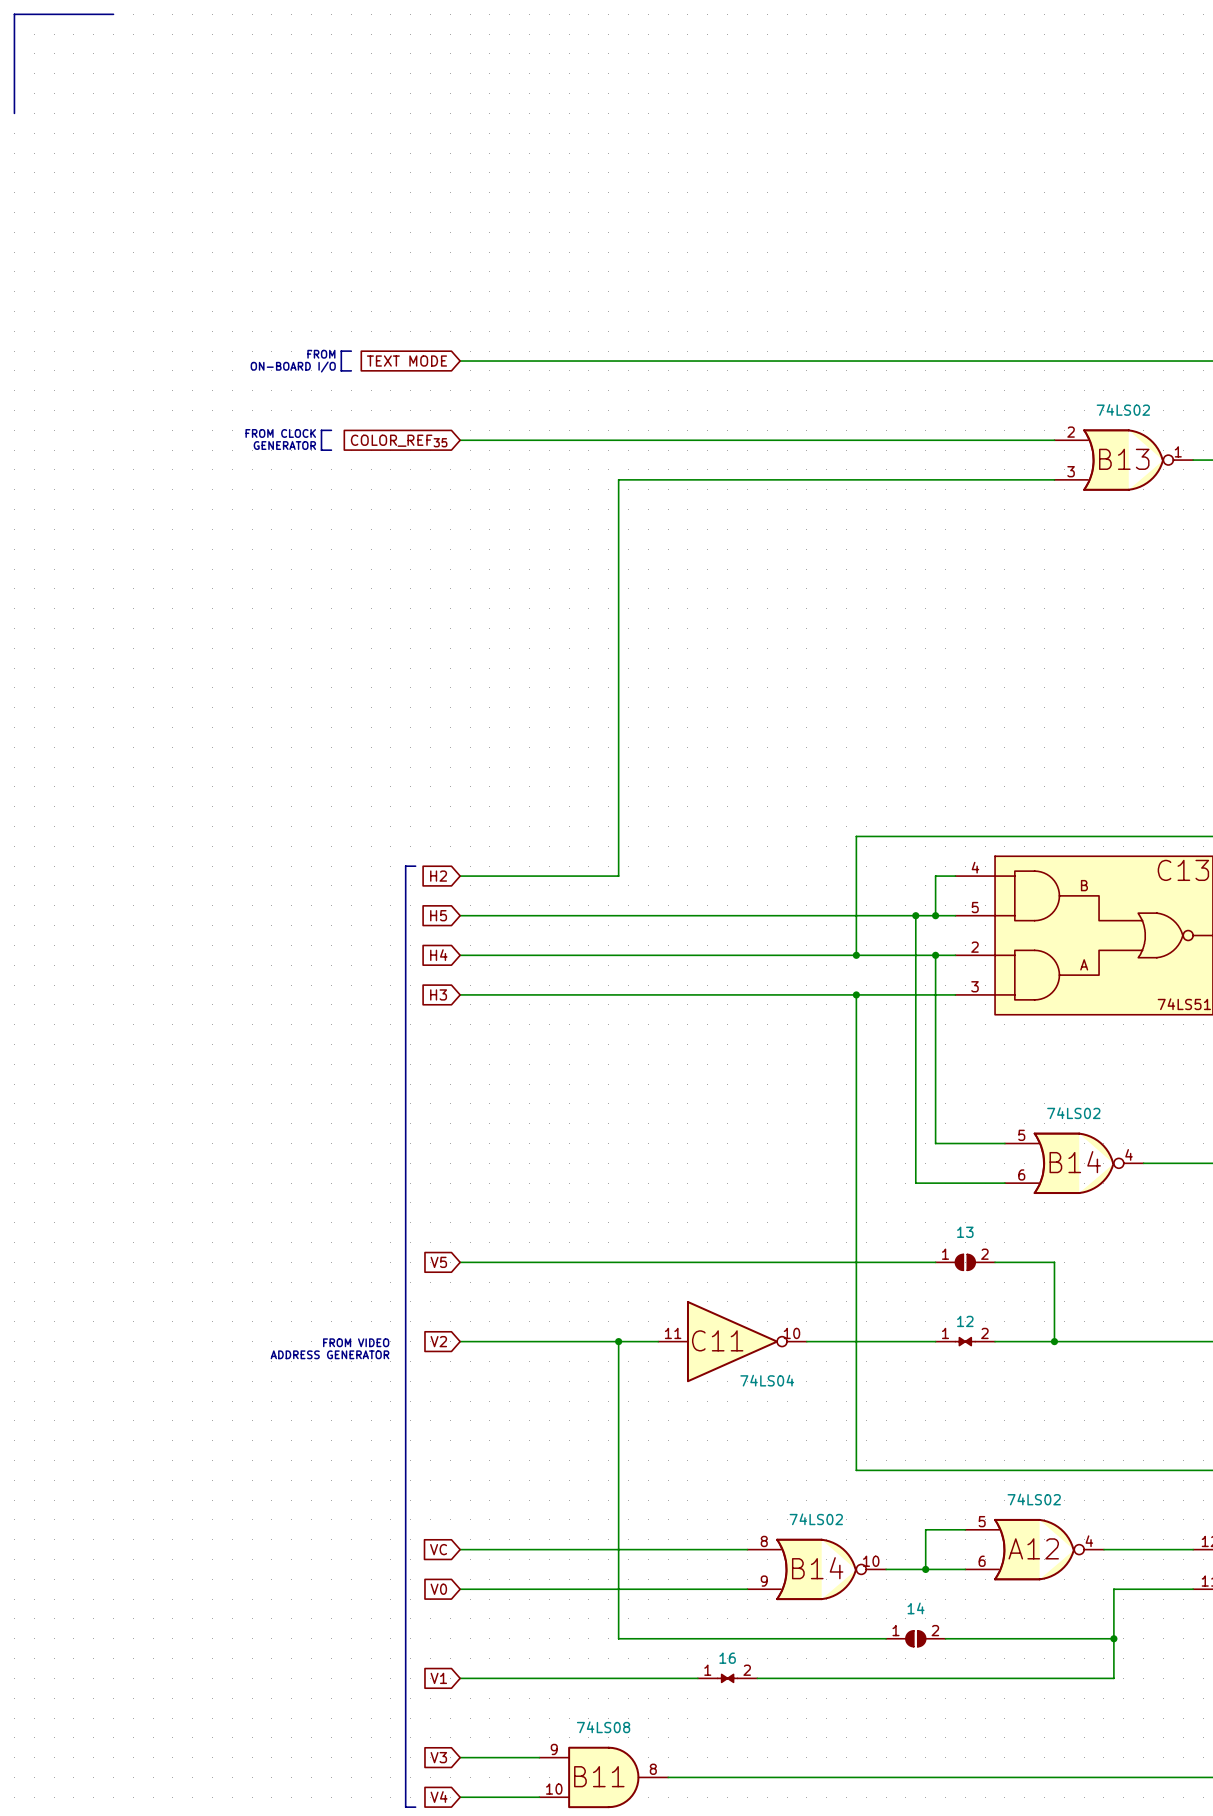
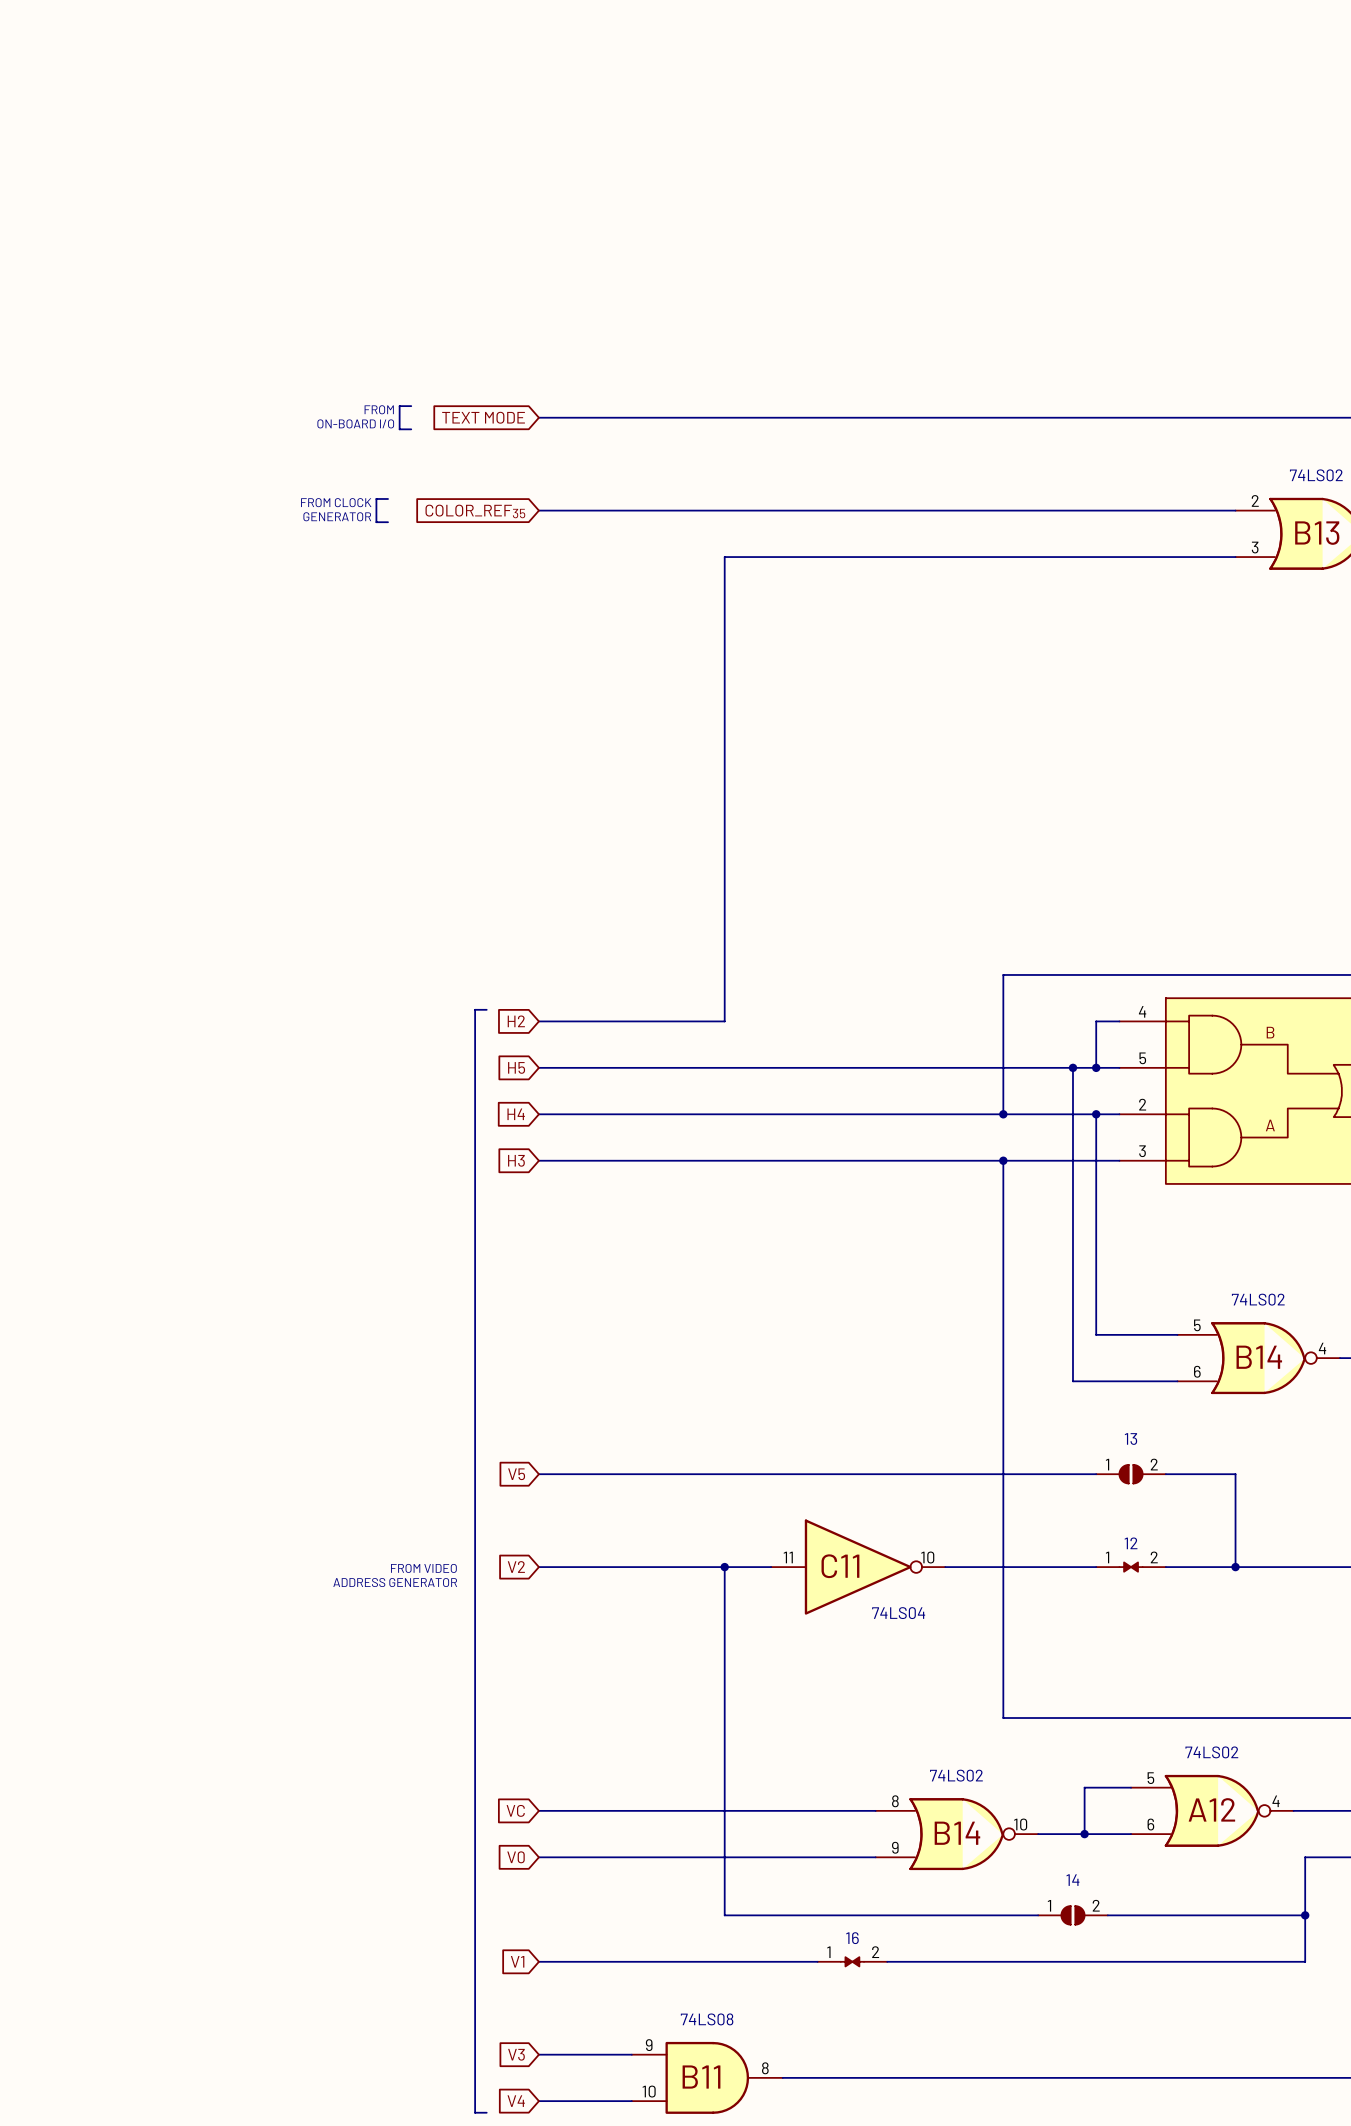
line: (113, 14) (14, 14) (14, 113) -> none

